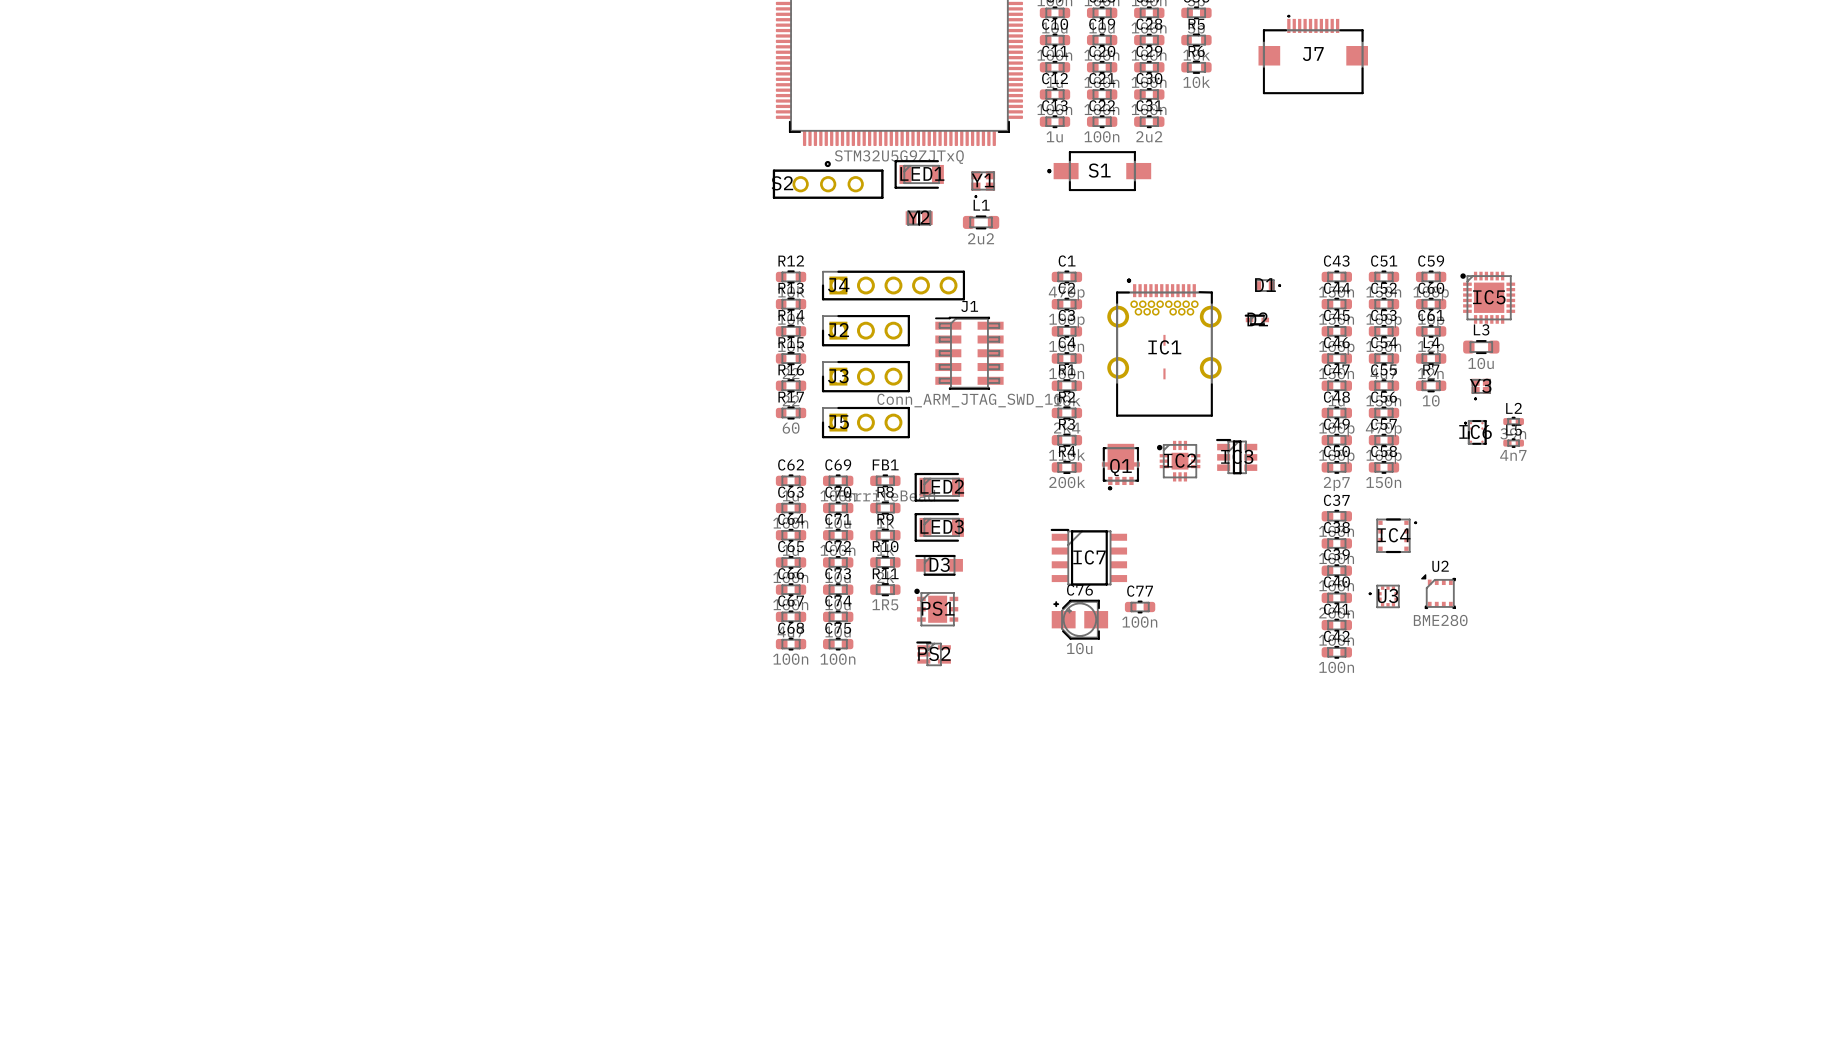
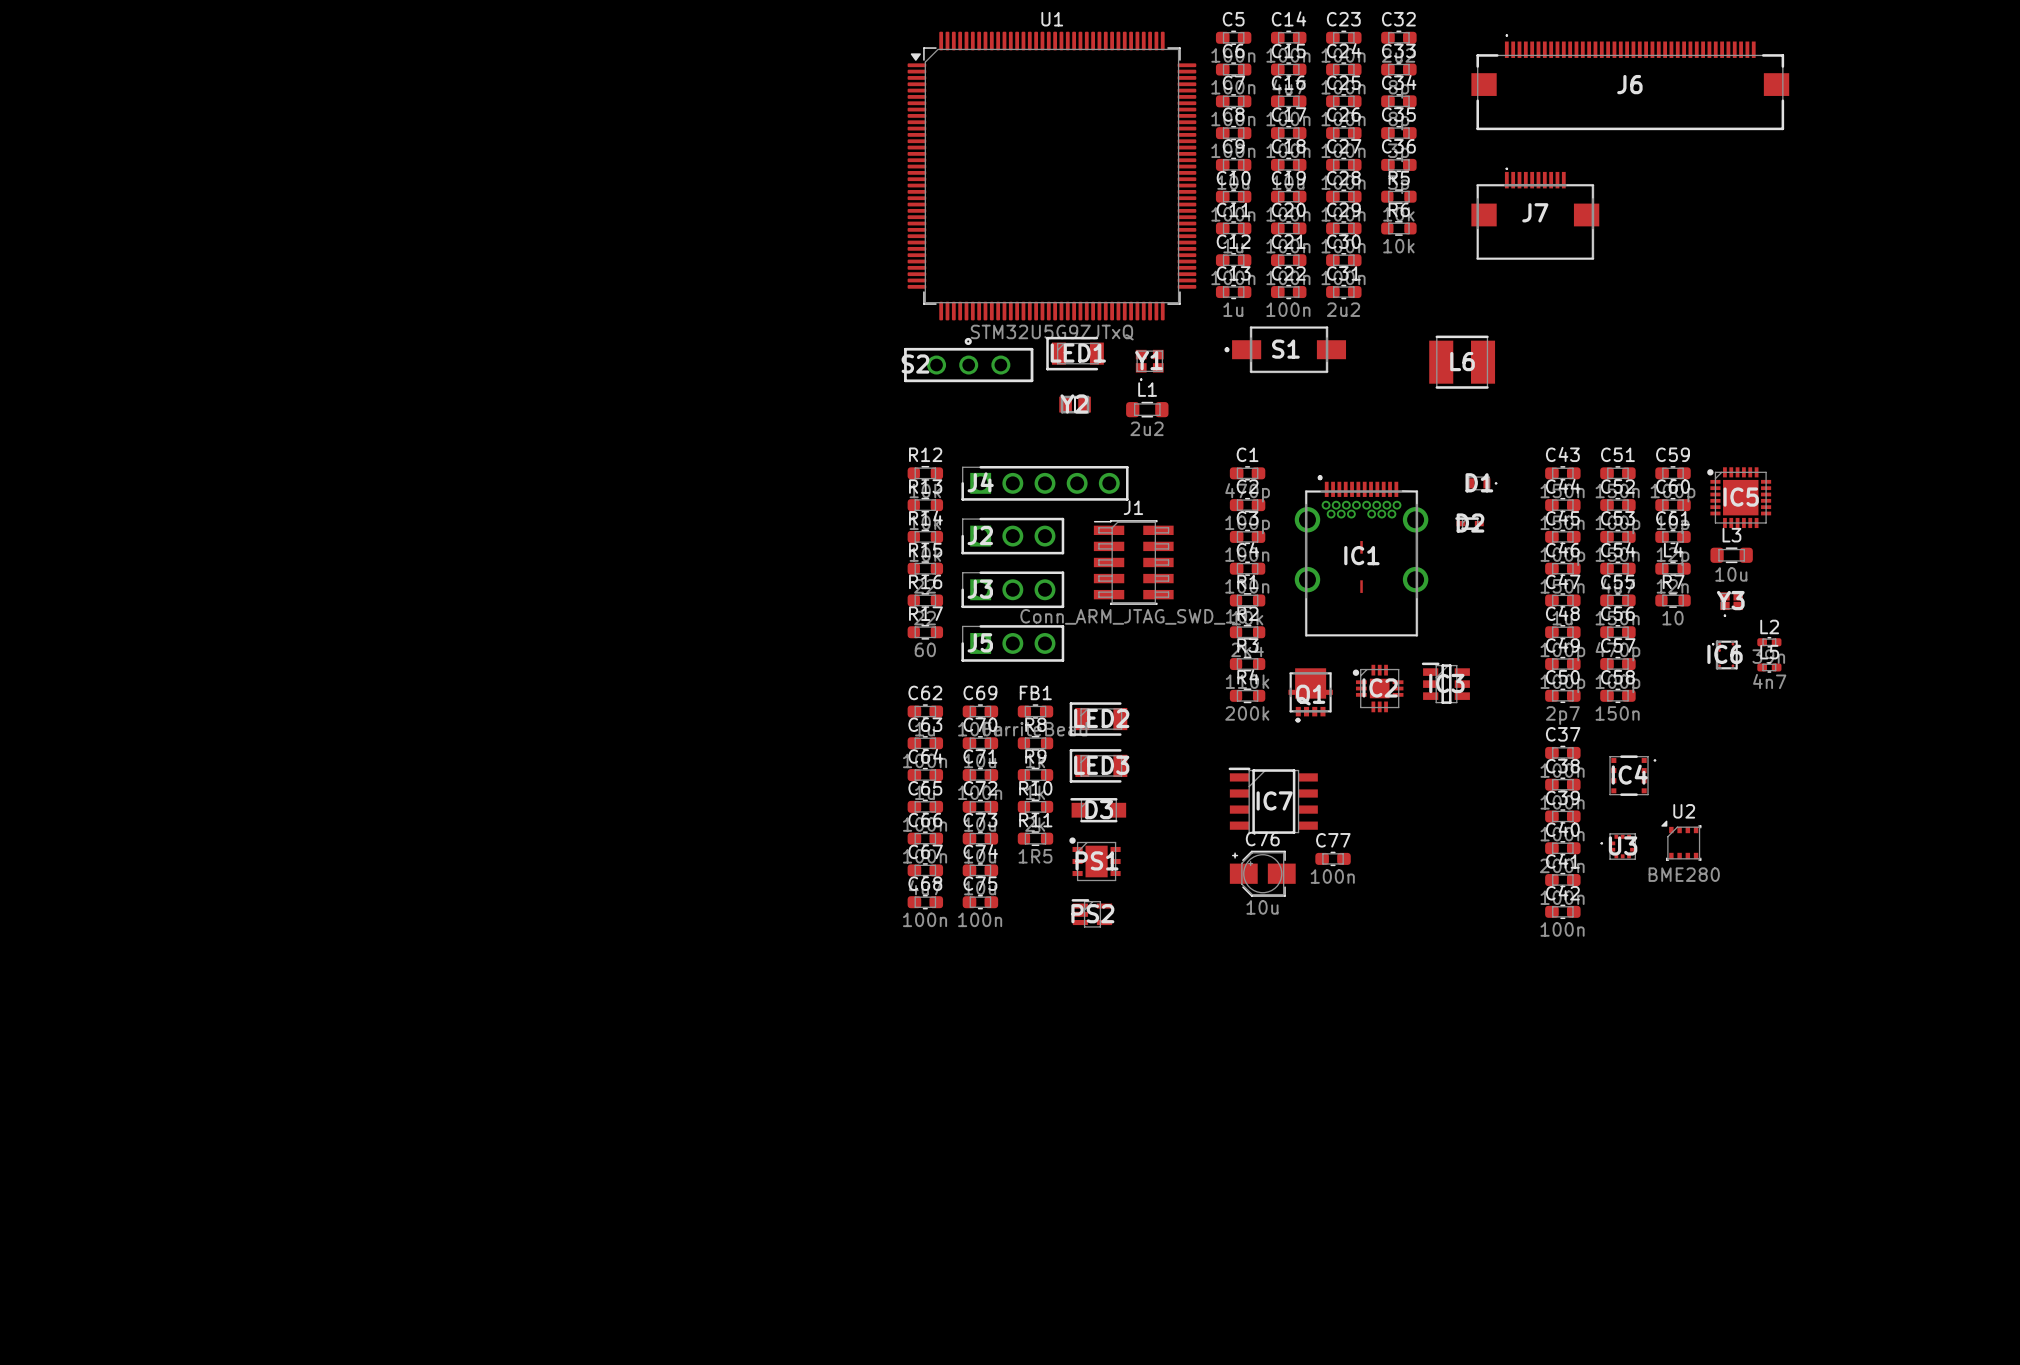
L6: none -> (1462, 362)

